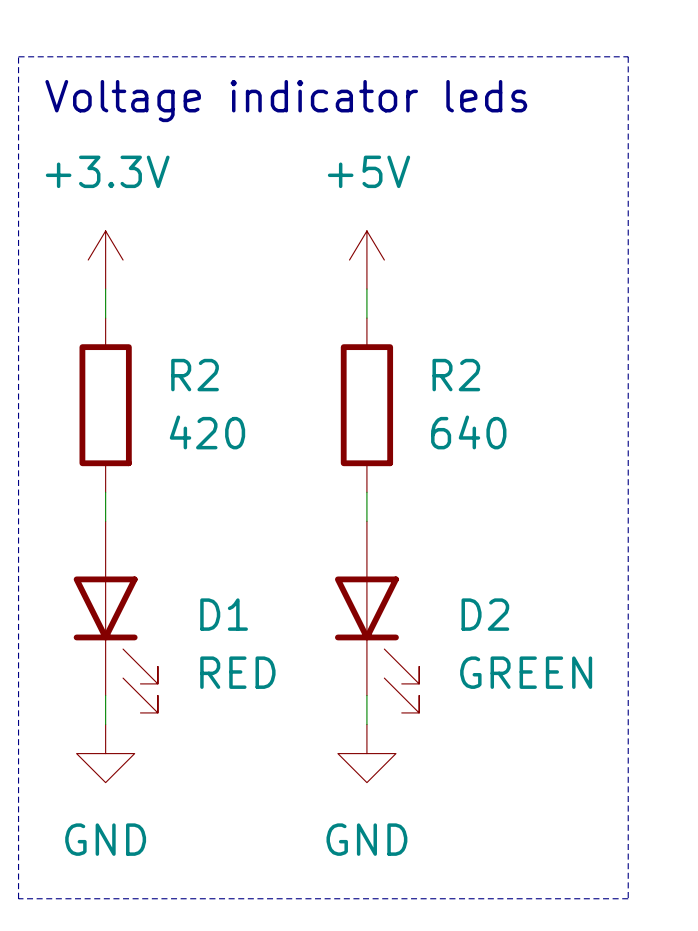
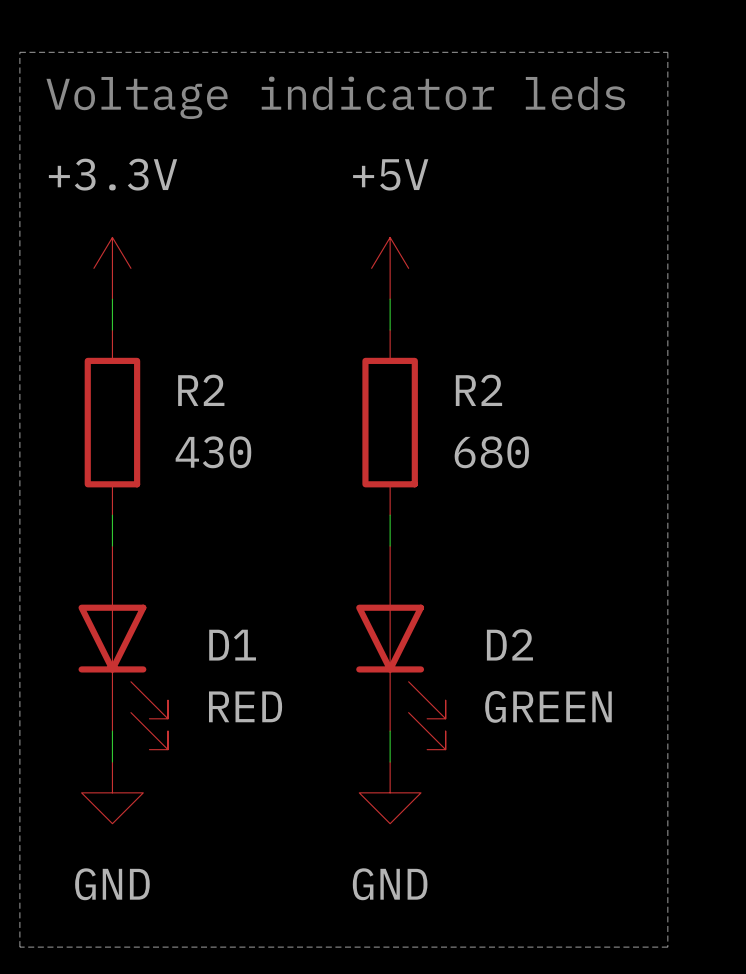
R2 value: 420 (207, 432) -> 430 (213, 452)
R2 value: 640 (468, 432) -> 680 (491, 452)

